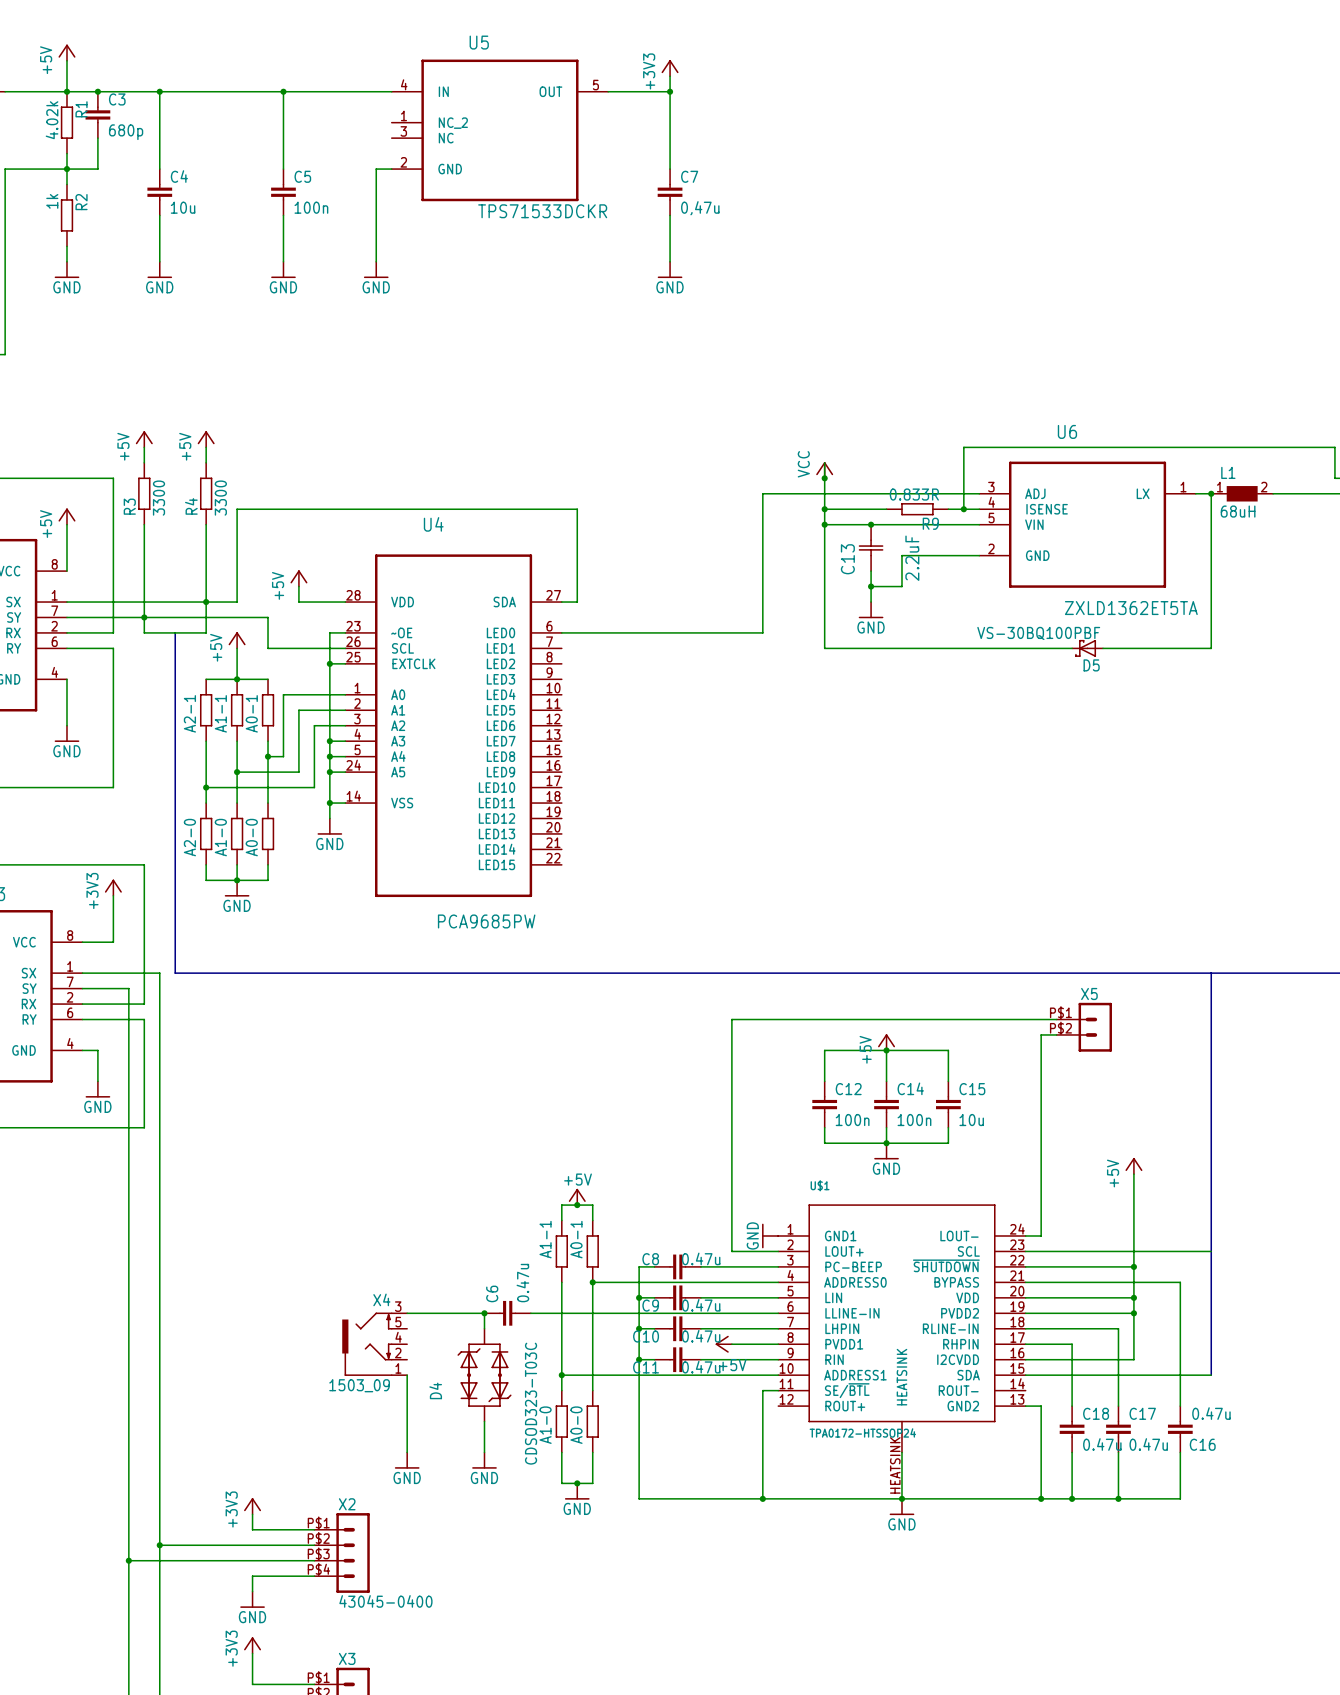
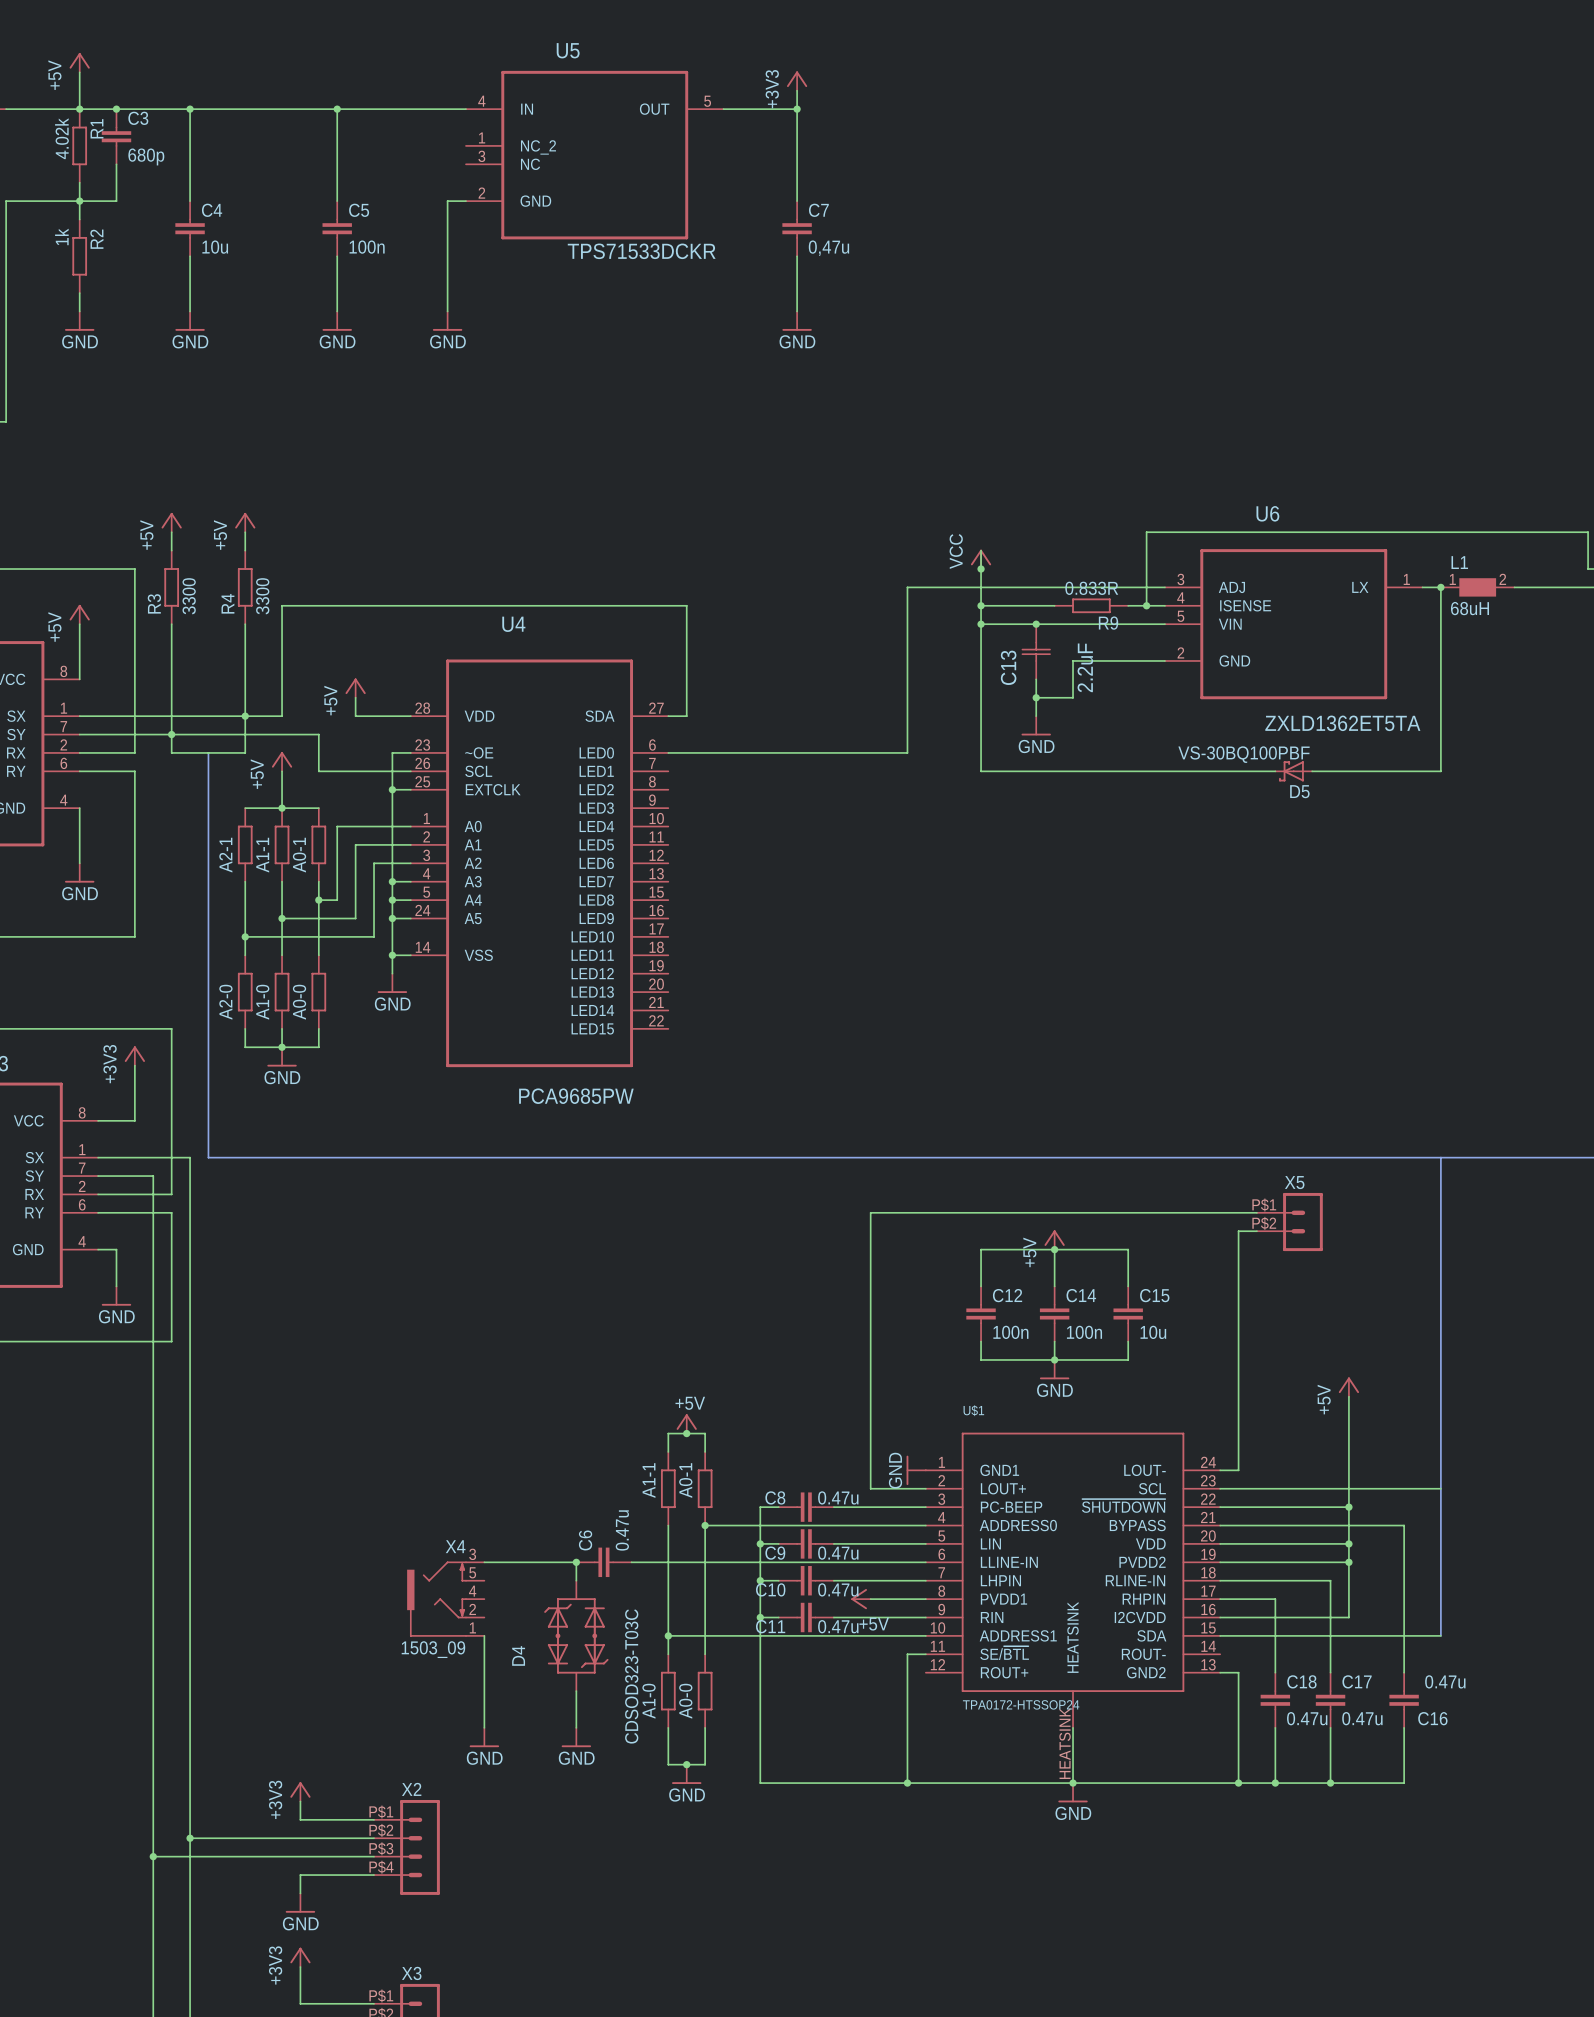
X2 value: 43045-0400 (385, 1601) -> none

